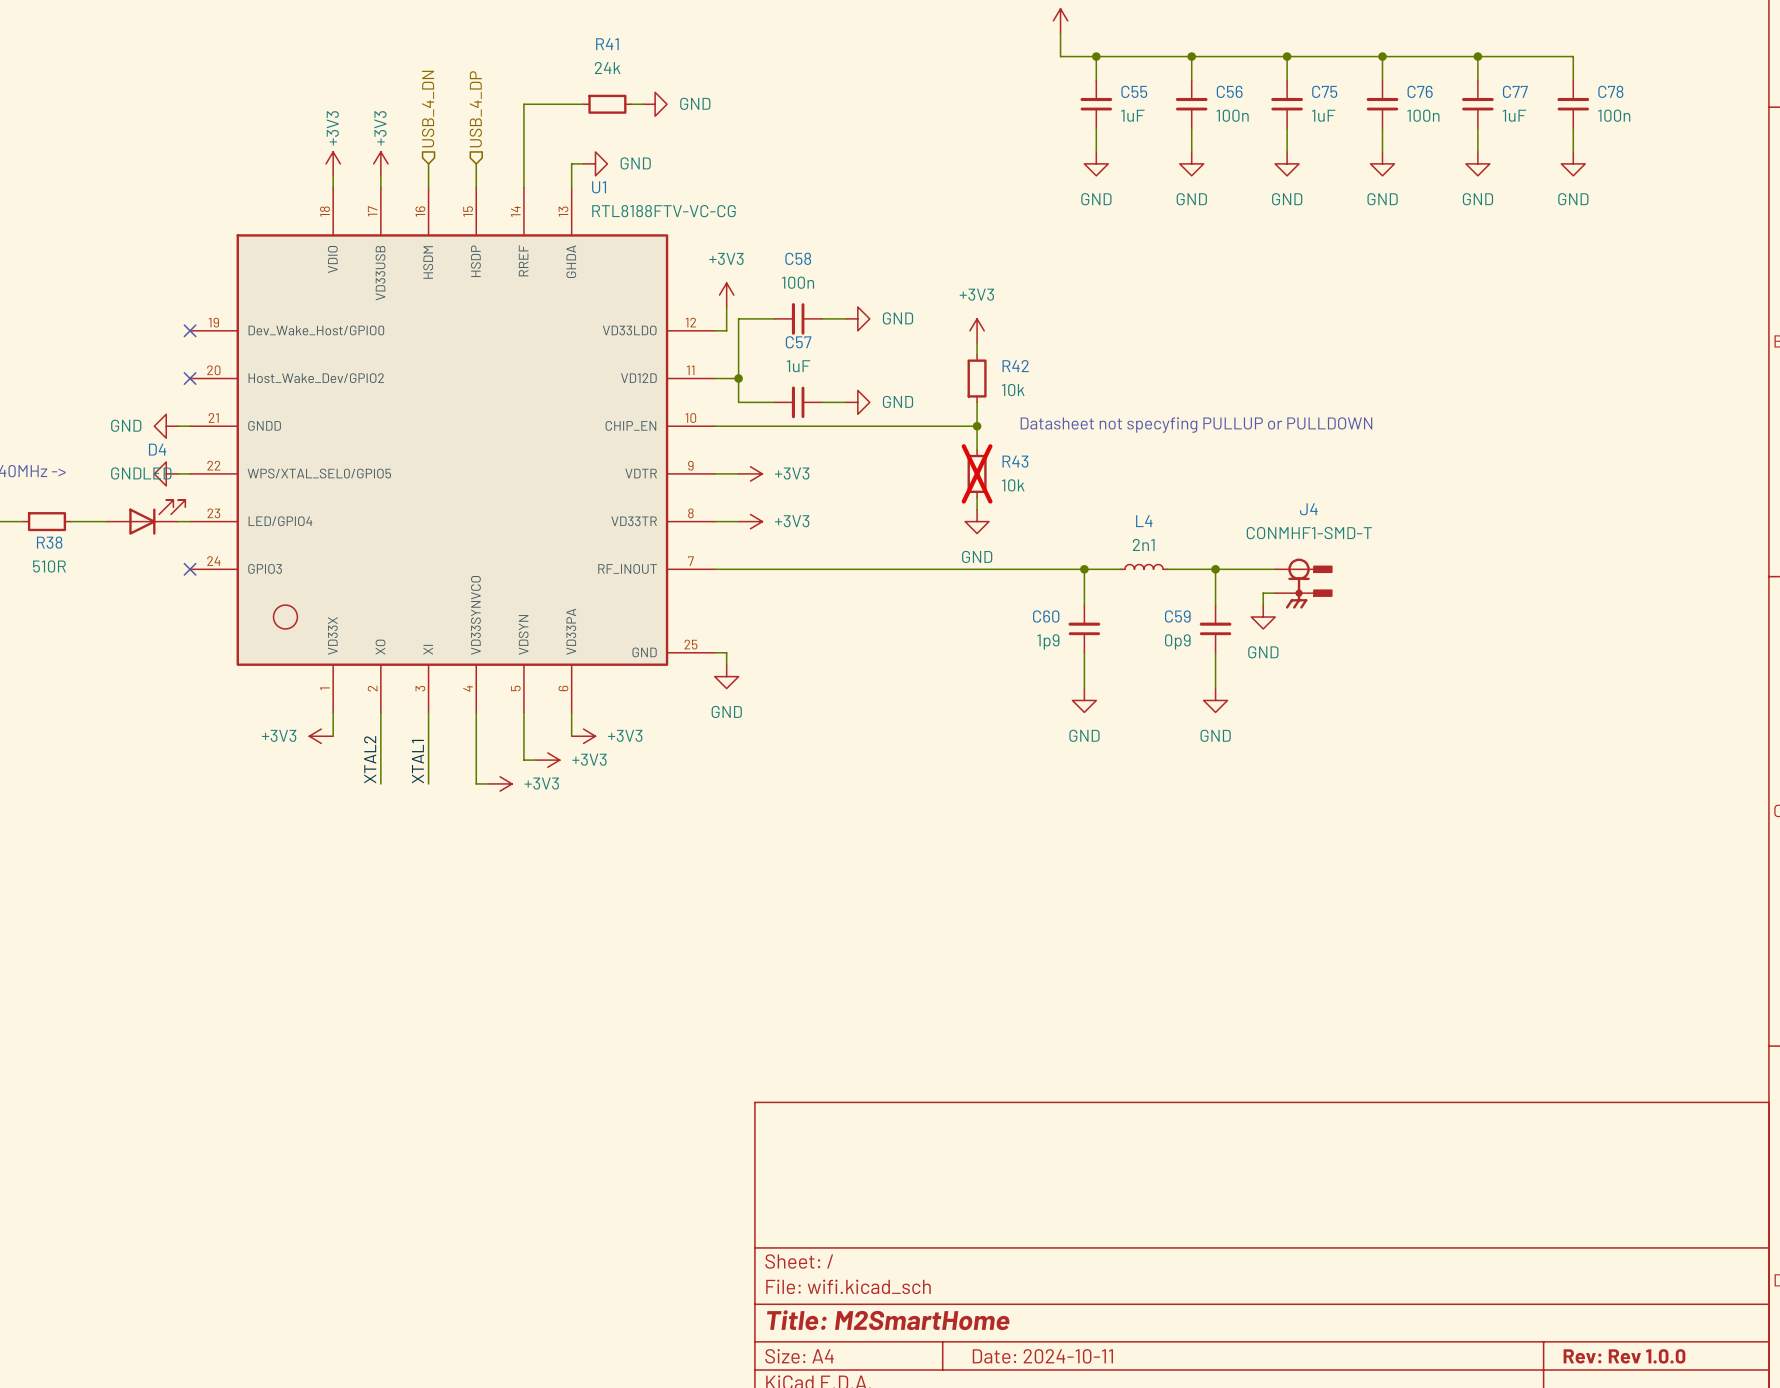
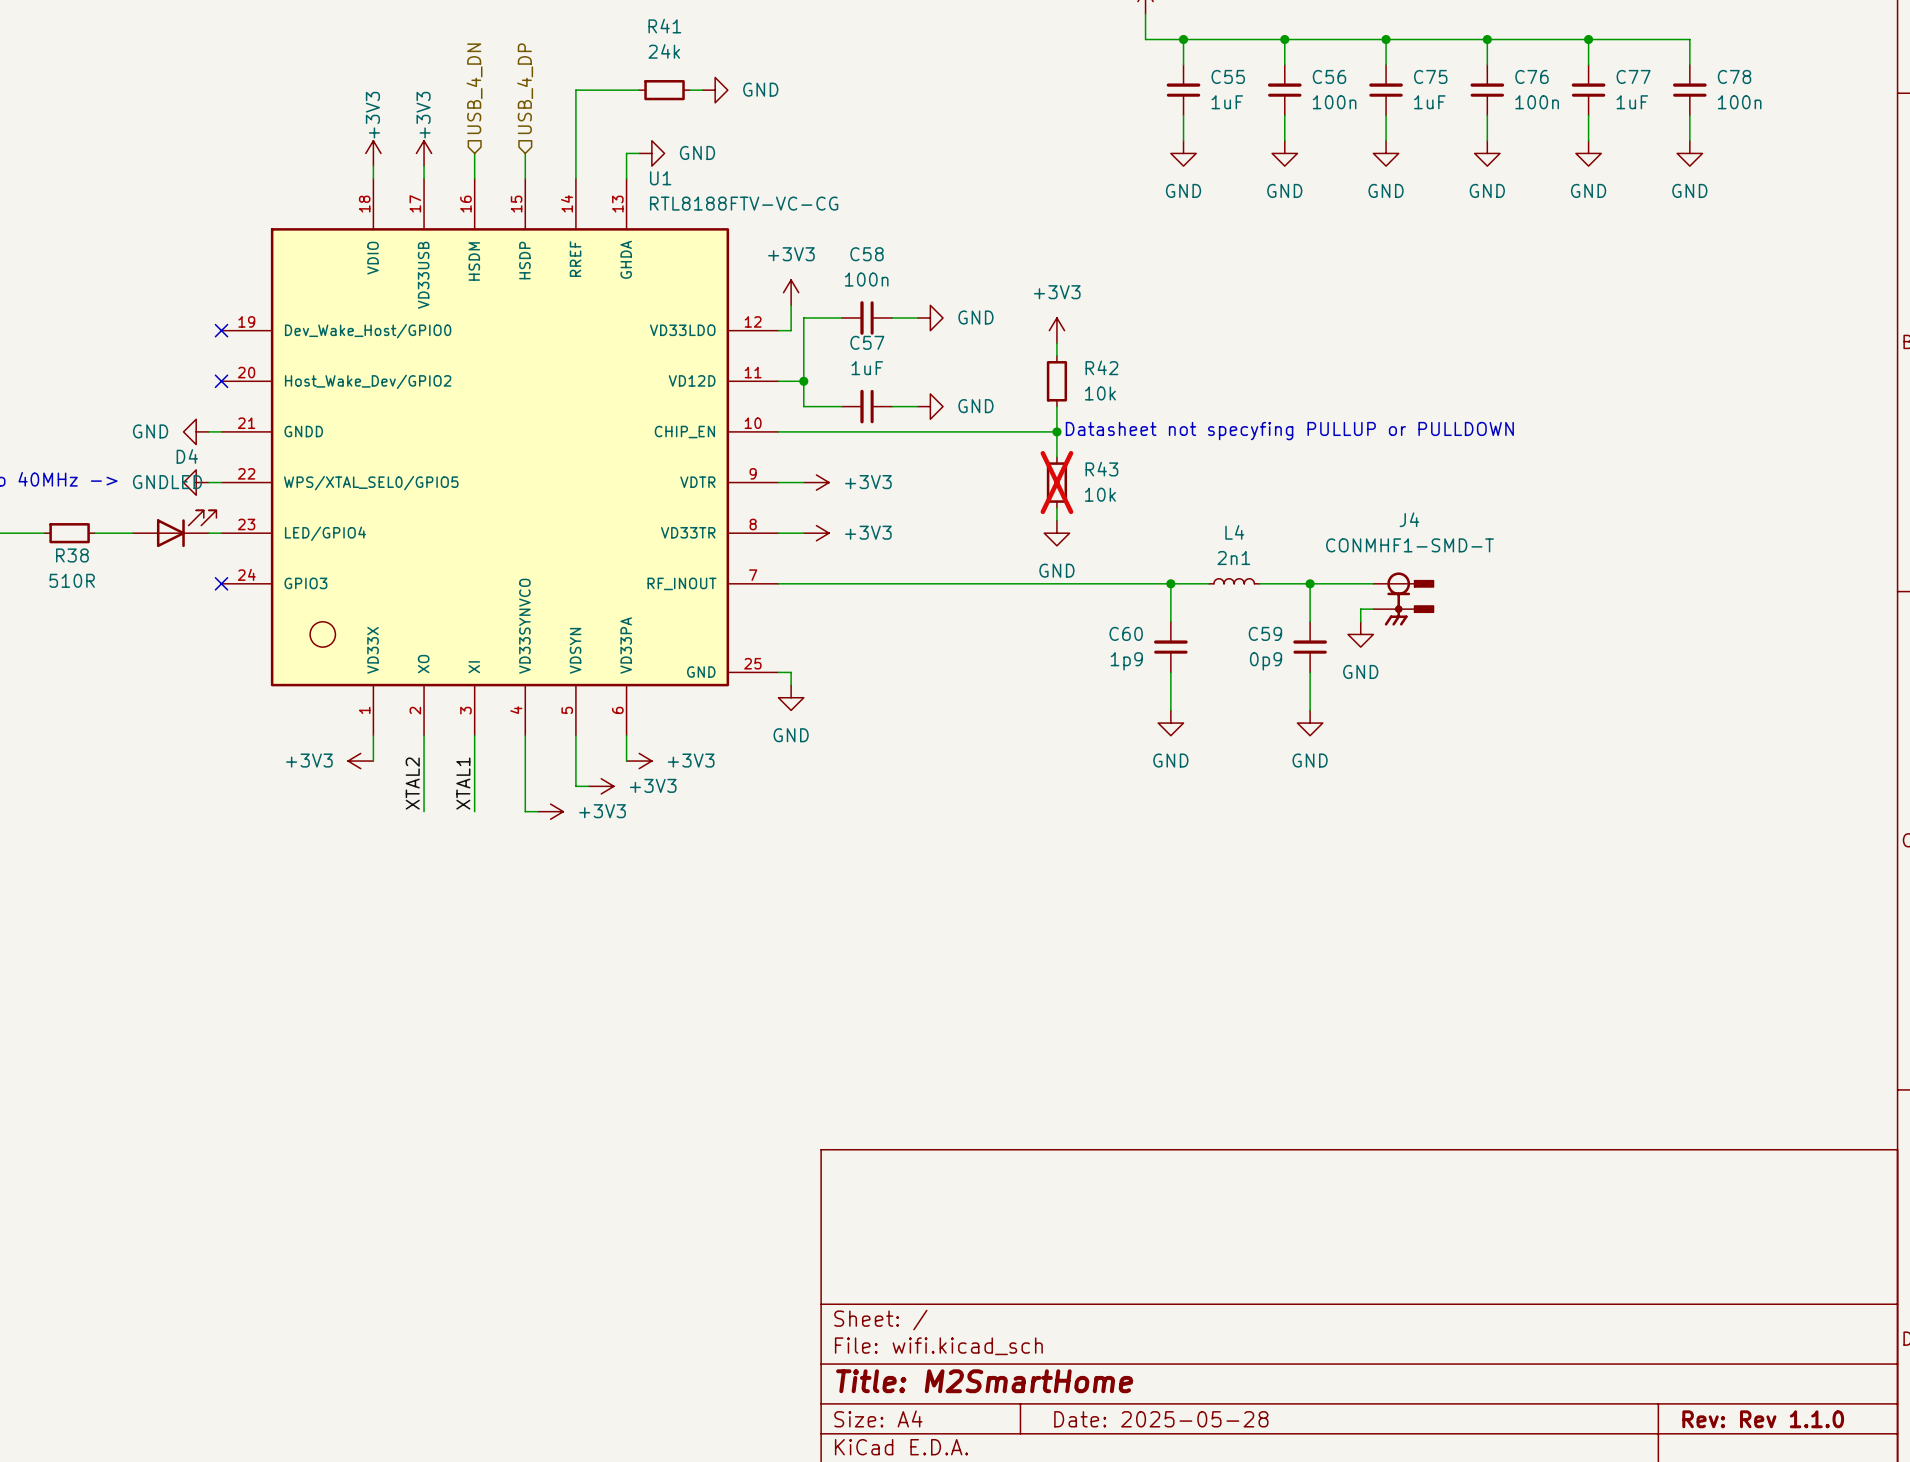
title block: Date: 2024-10-11 (1042, 1356) -> Date: 2025-05-28 (1161, 1419)
title block: Rev: Rev 1.0.0 (1624, 1356) -> Rev: Rev 1.1.0 (1763, 1419)

